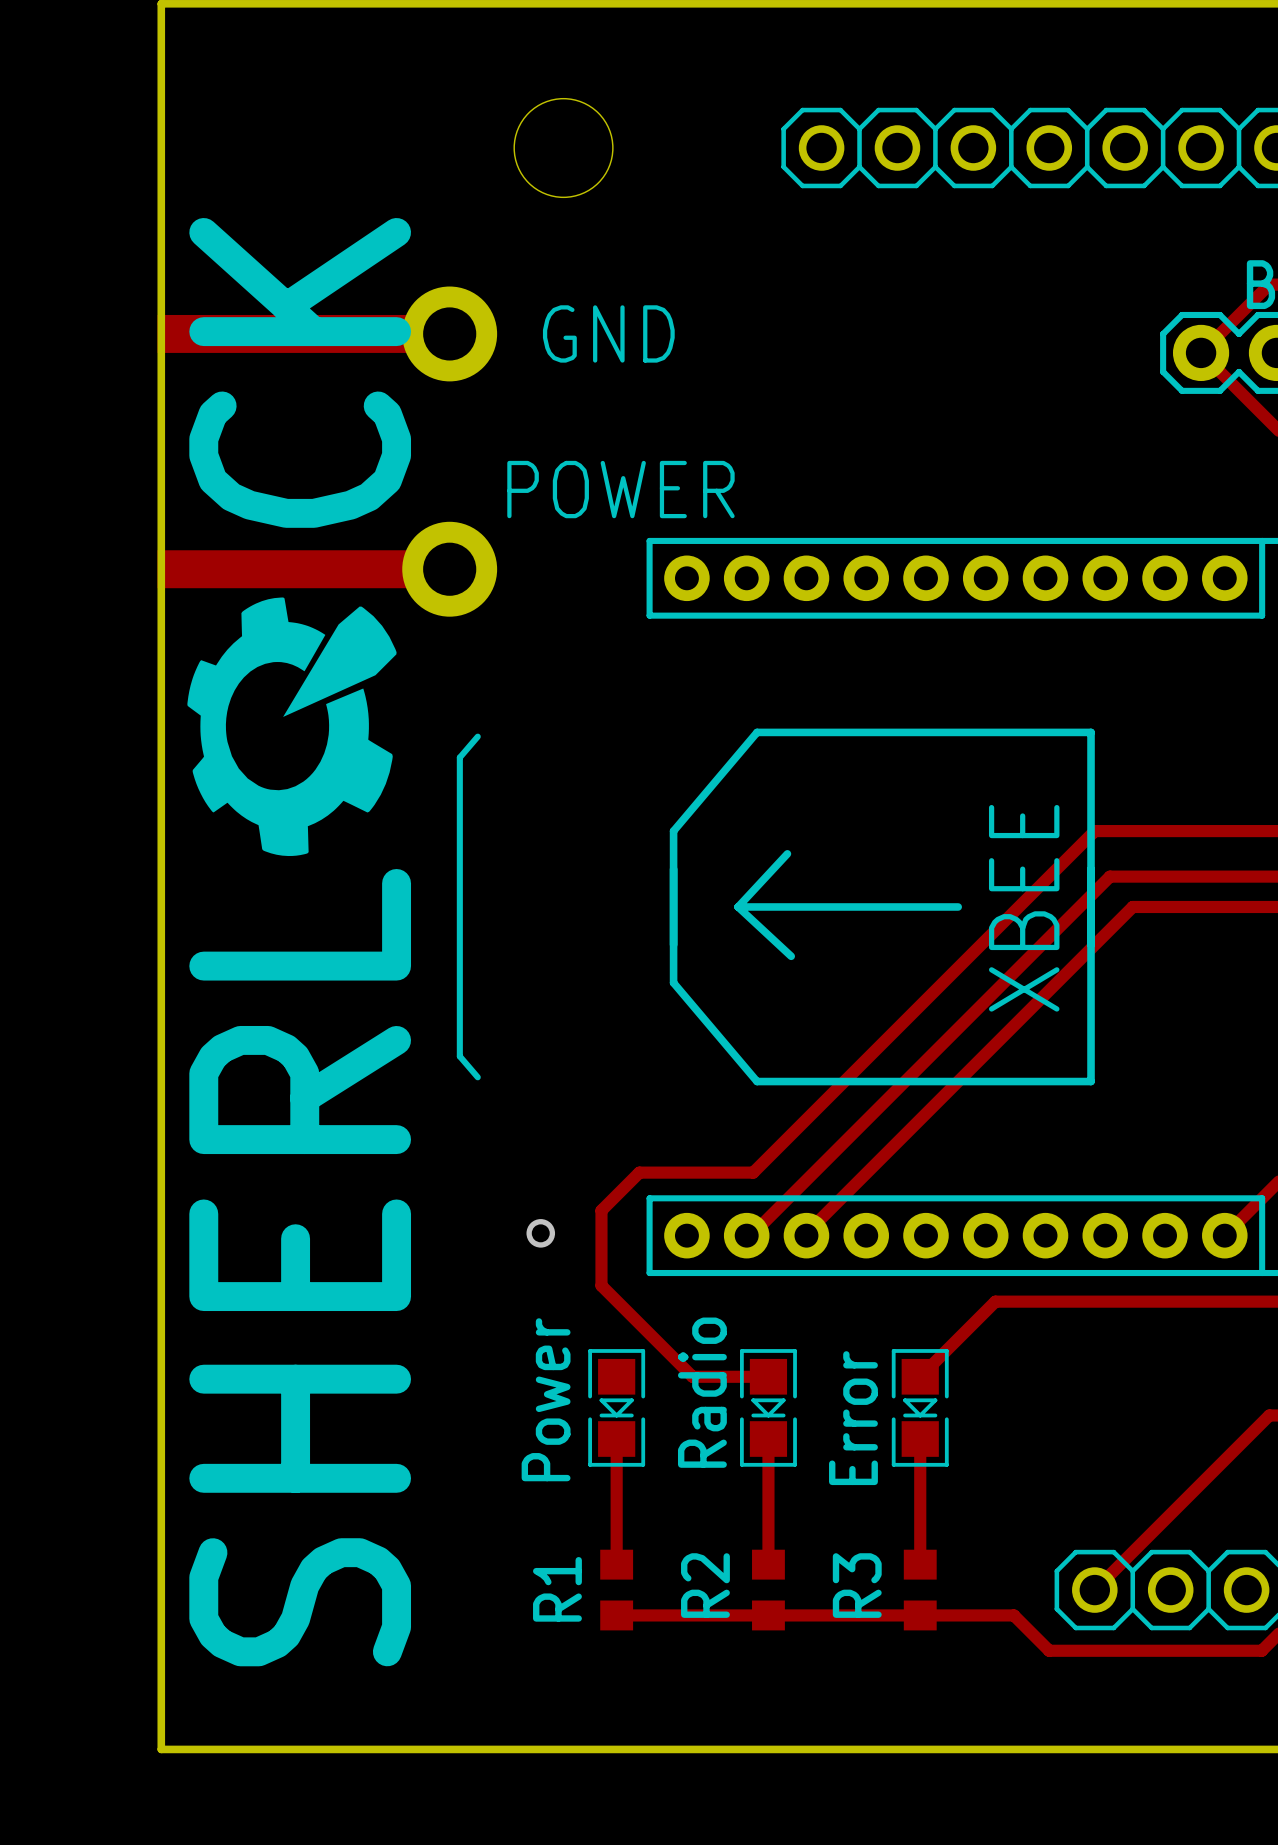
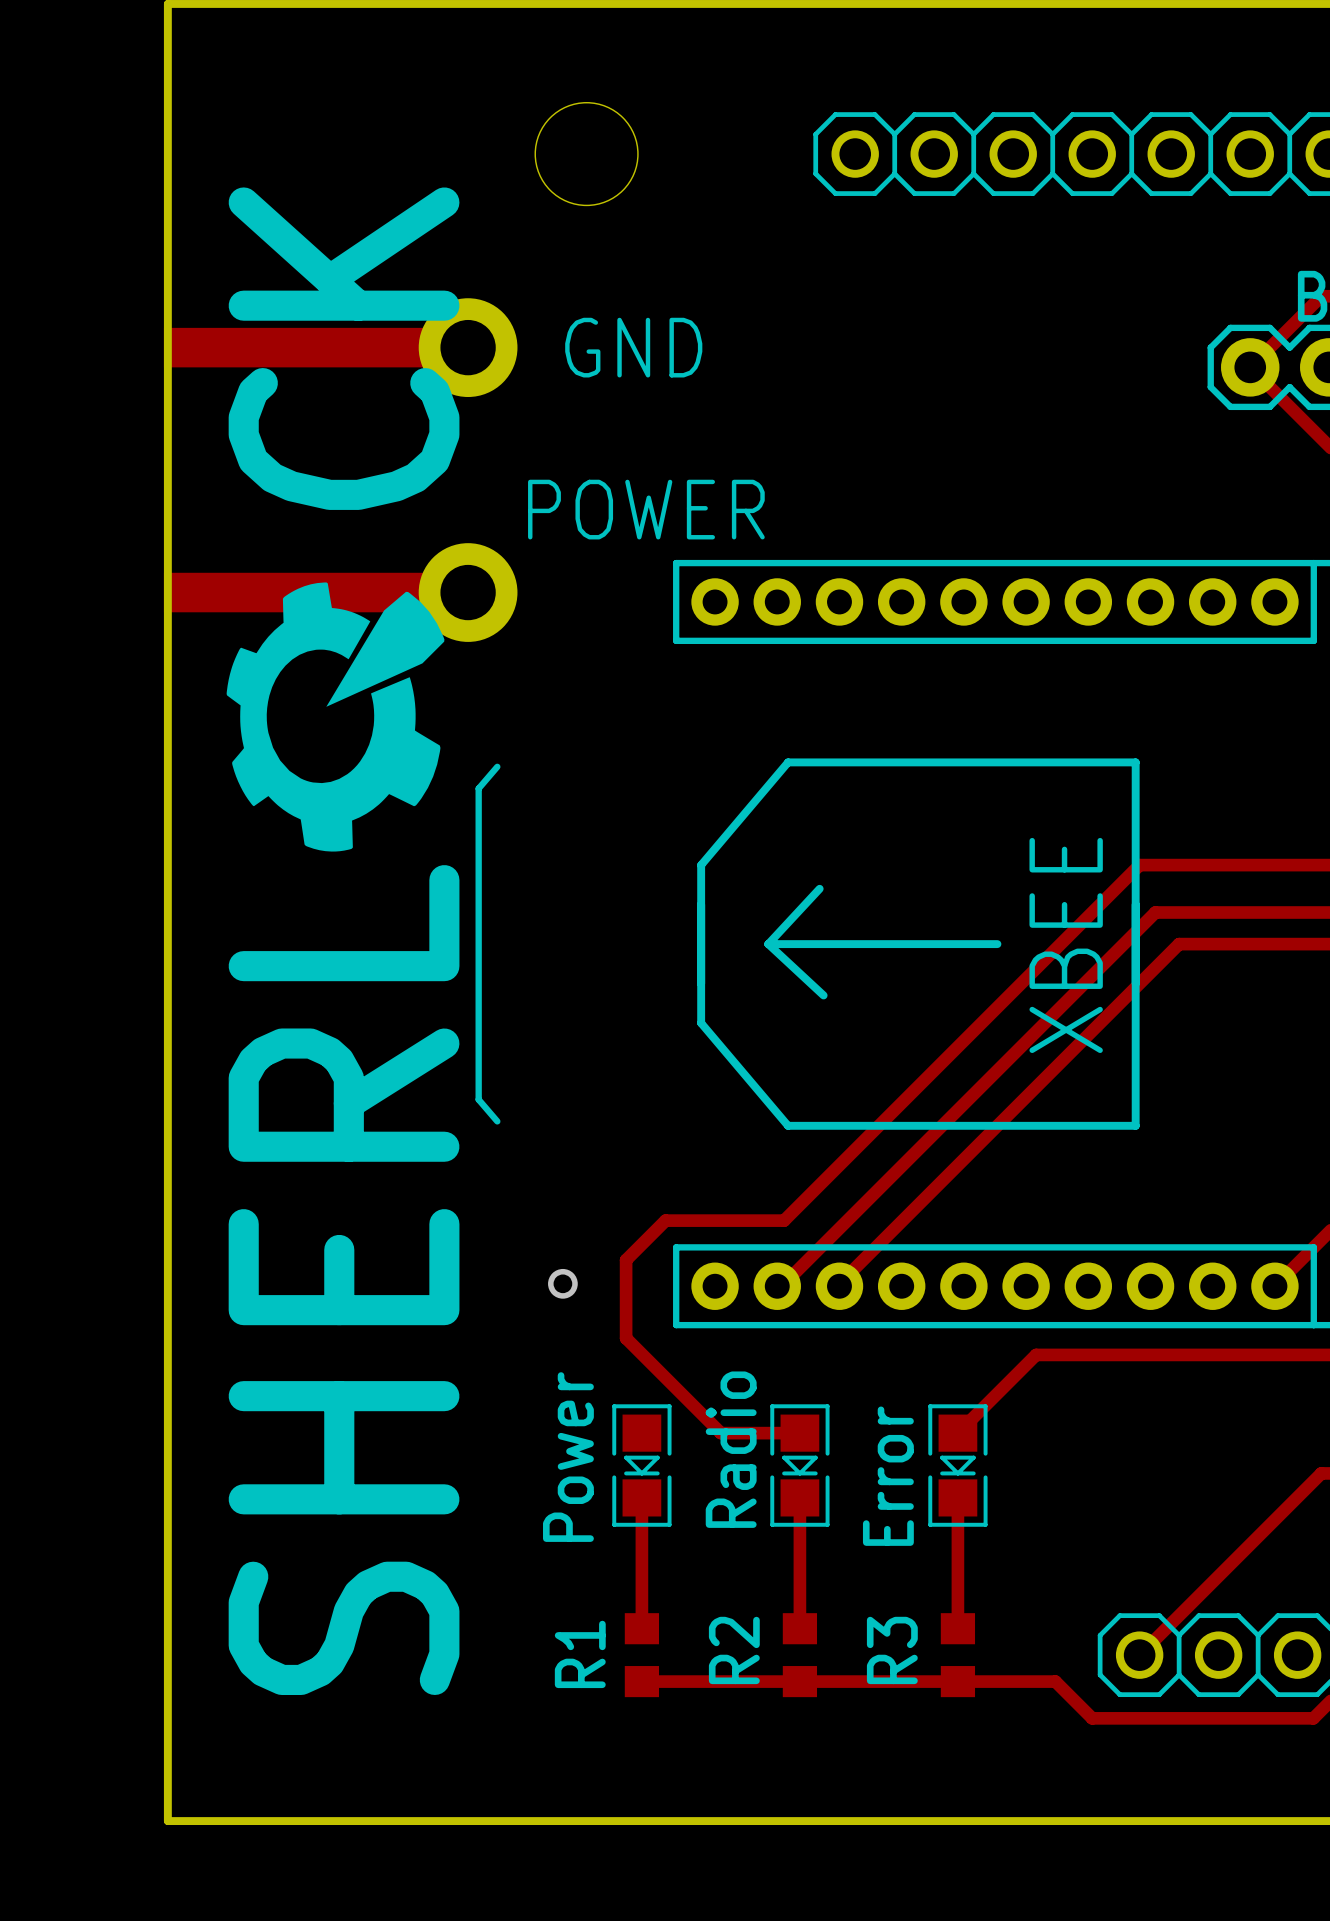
drawing position: (291, 726) -> (335, 716)

